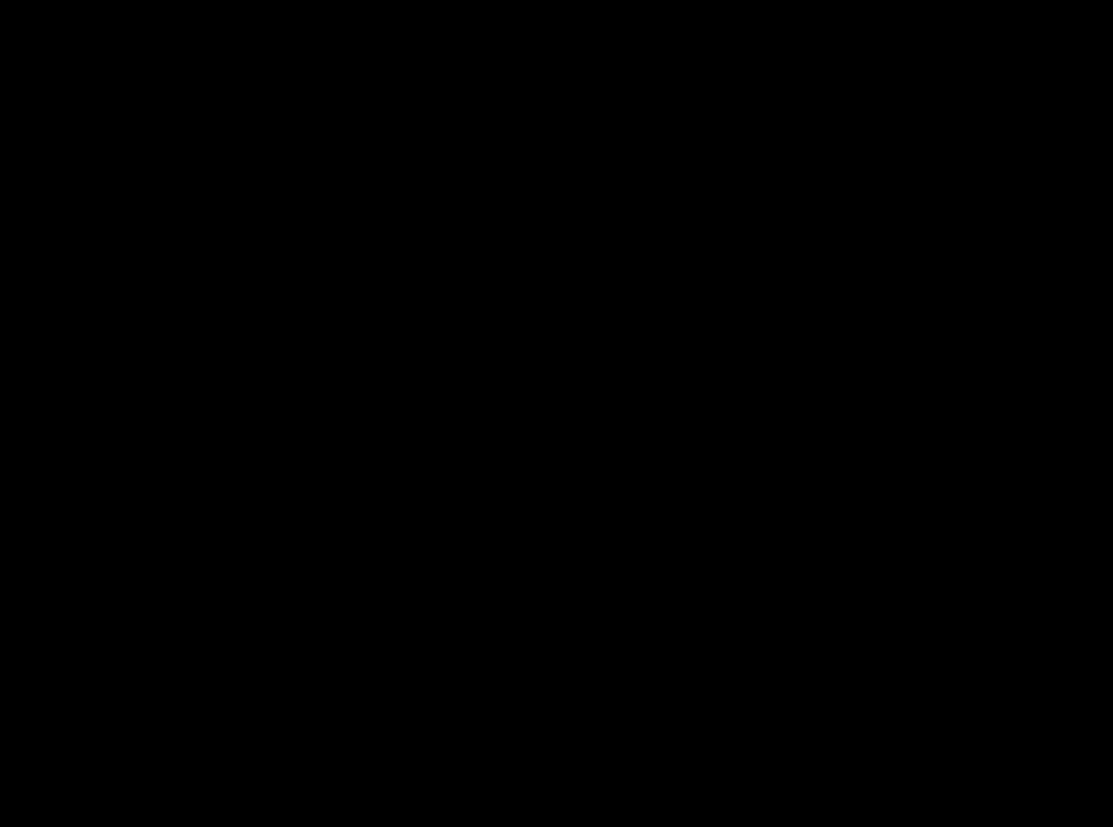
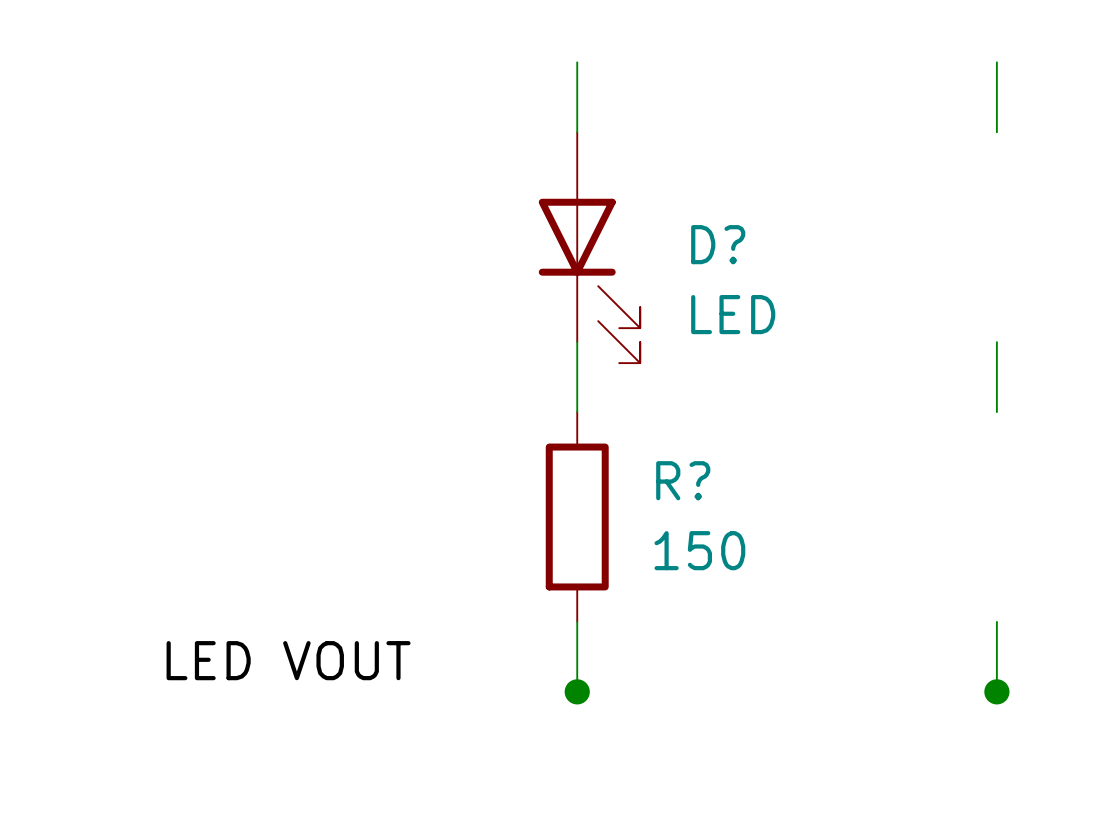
wire: none -> (577, 62) (577, 132)
wire: none -> (996, 62) (996, 132)
D?: none -> LED (589, 247)
wire: none -> (577, 342) (577, 412)
wire: none -> (996, 342) (996, 412)
R?: none -> 150 (577, 516)
wire: none -> (577, 621) (577, 691)
wire: none -> (996, 621) (996, 691)
label: none -> LED VOUT (288, 660)
junction: none -> (577, 691)
junction: none -> (996, 691)

